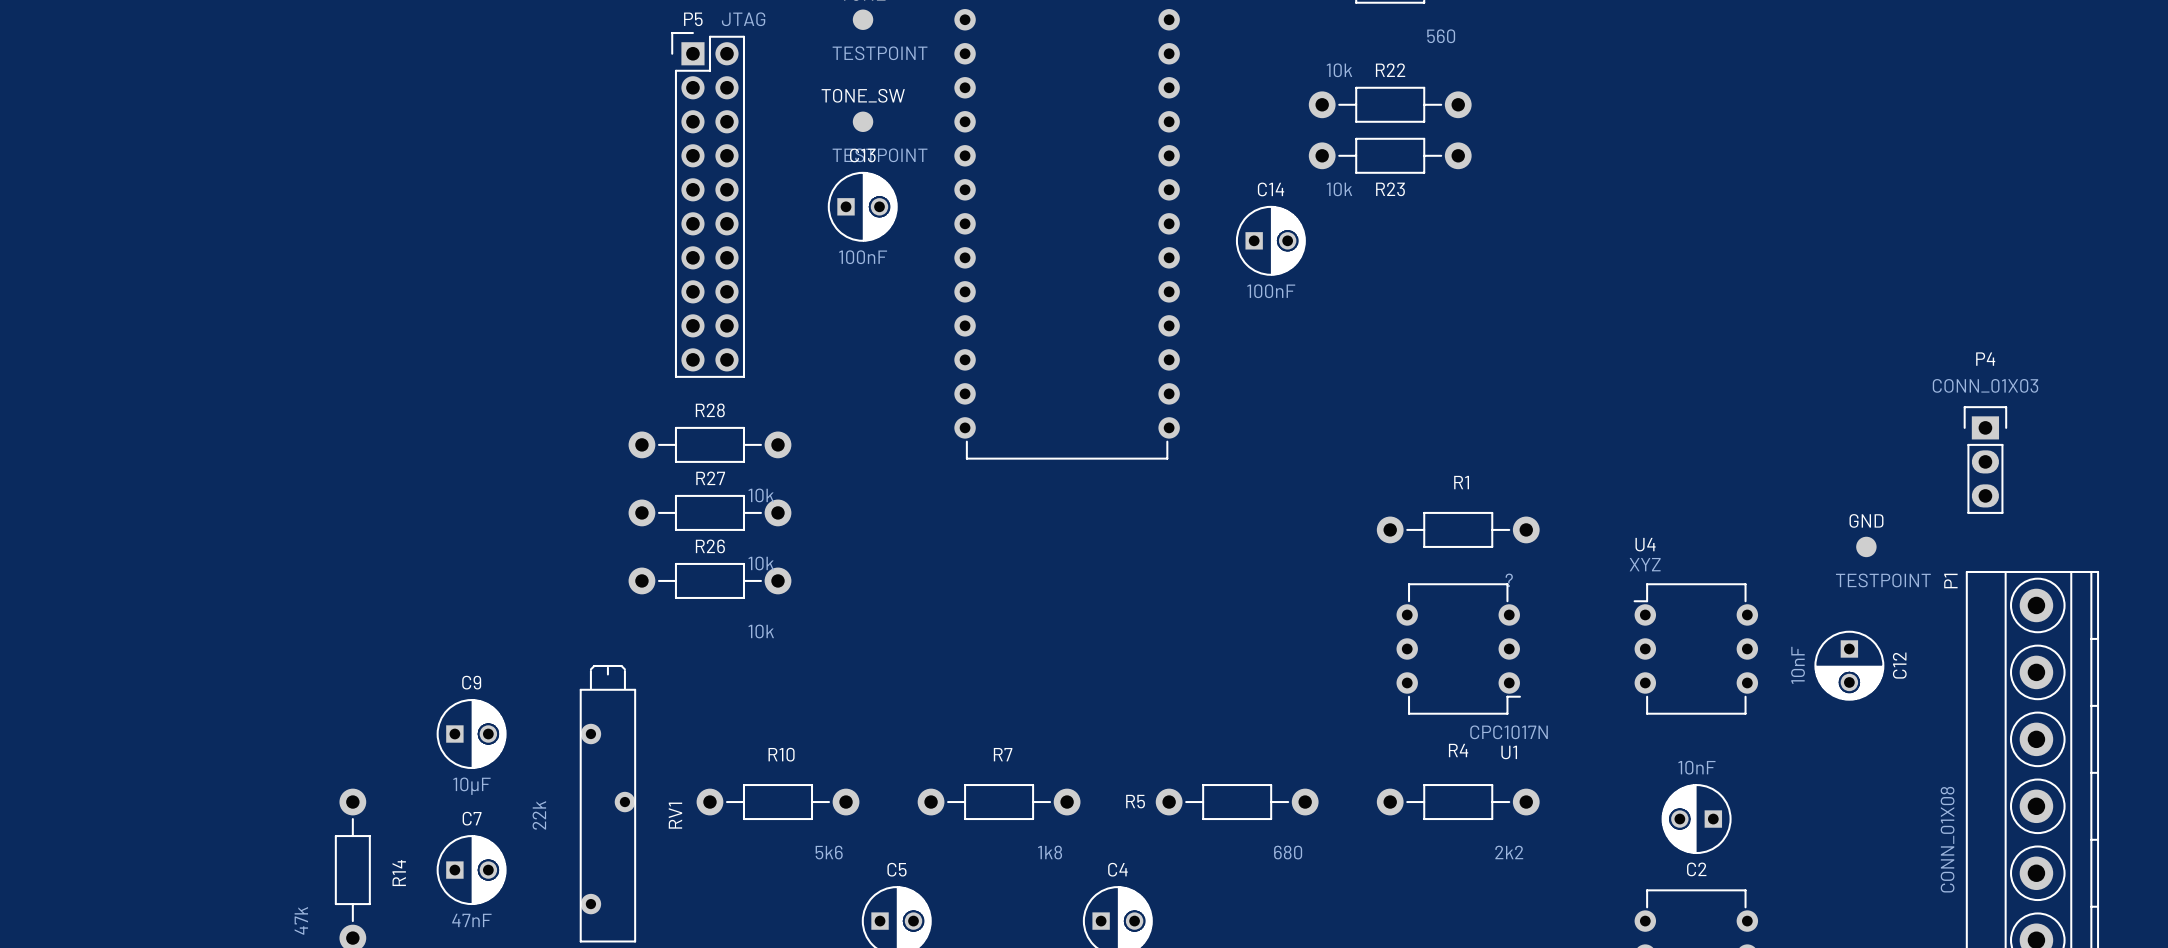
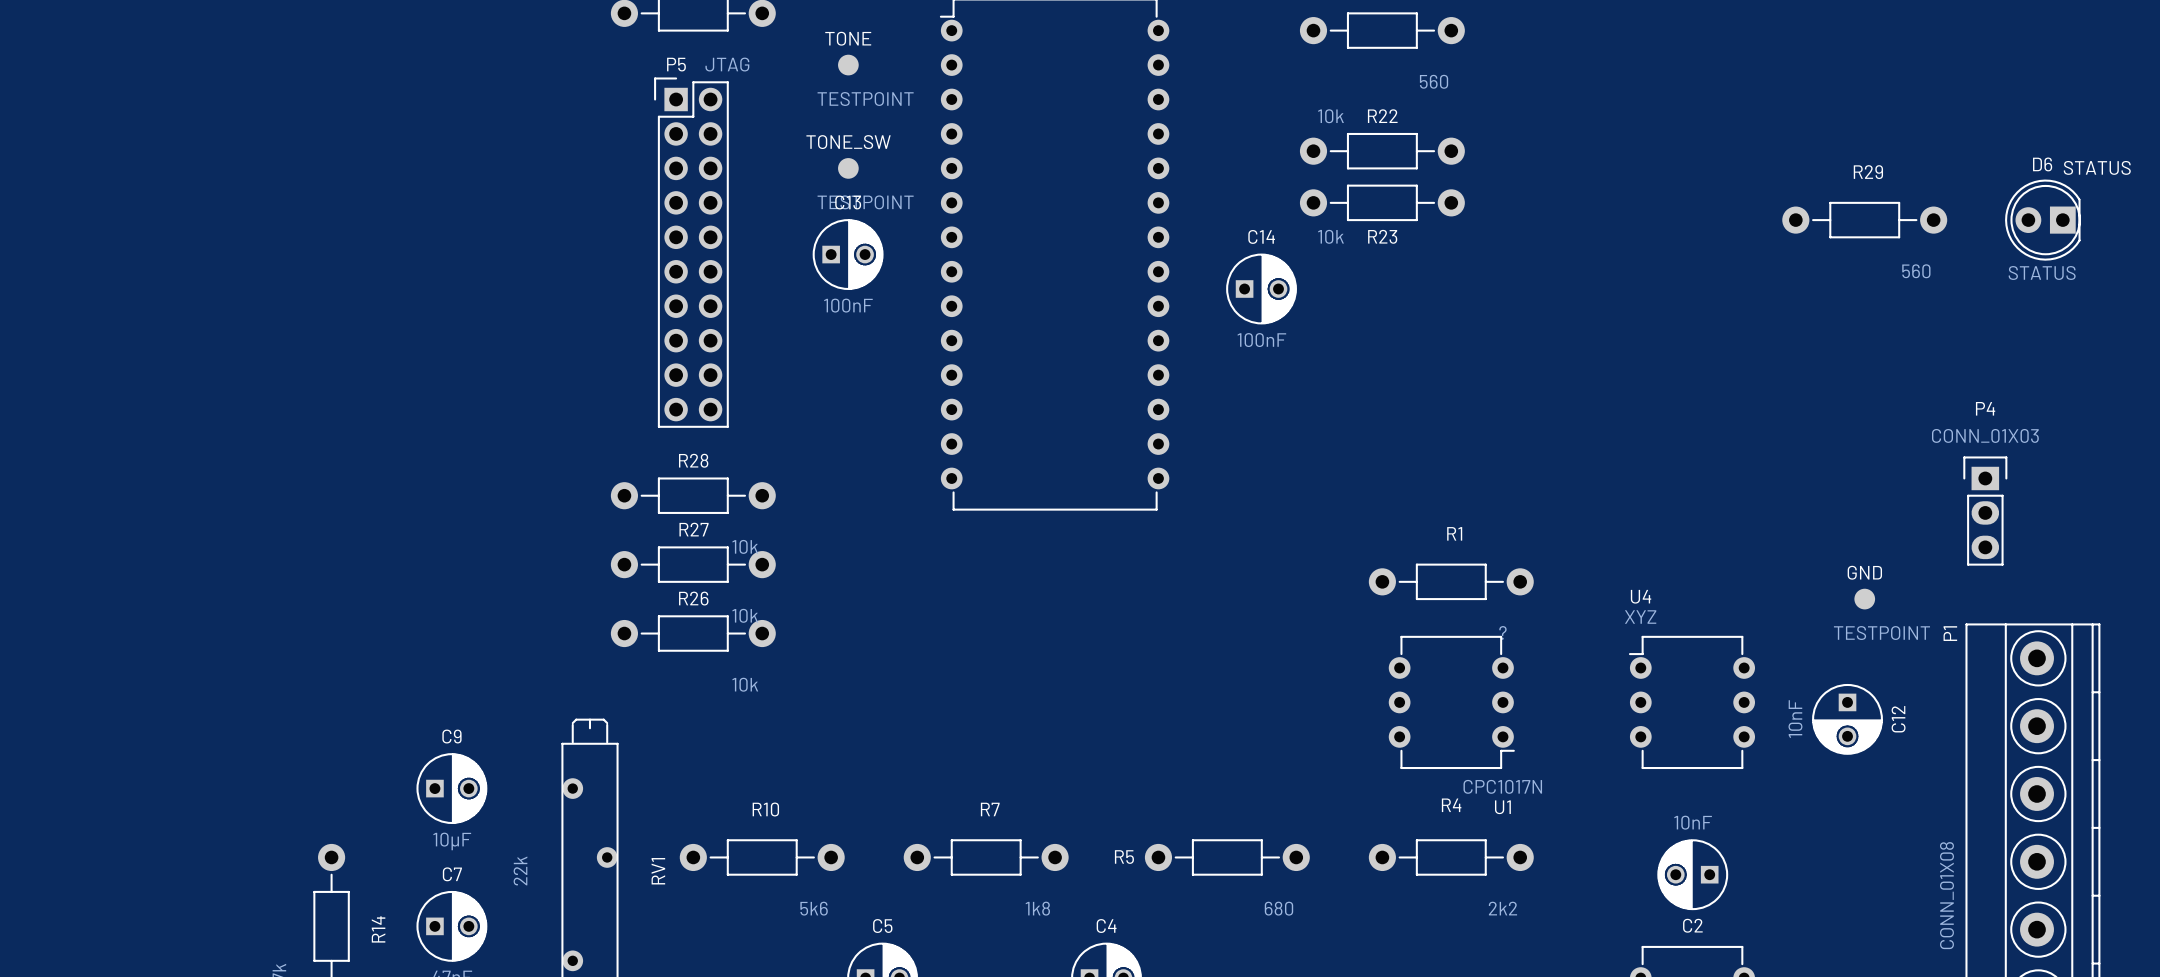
R29: none -> 560 (1864, 220)
D6: none -> STATUS (2042, 220)

